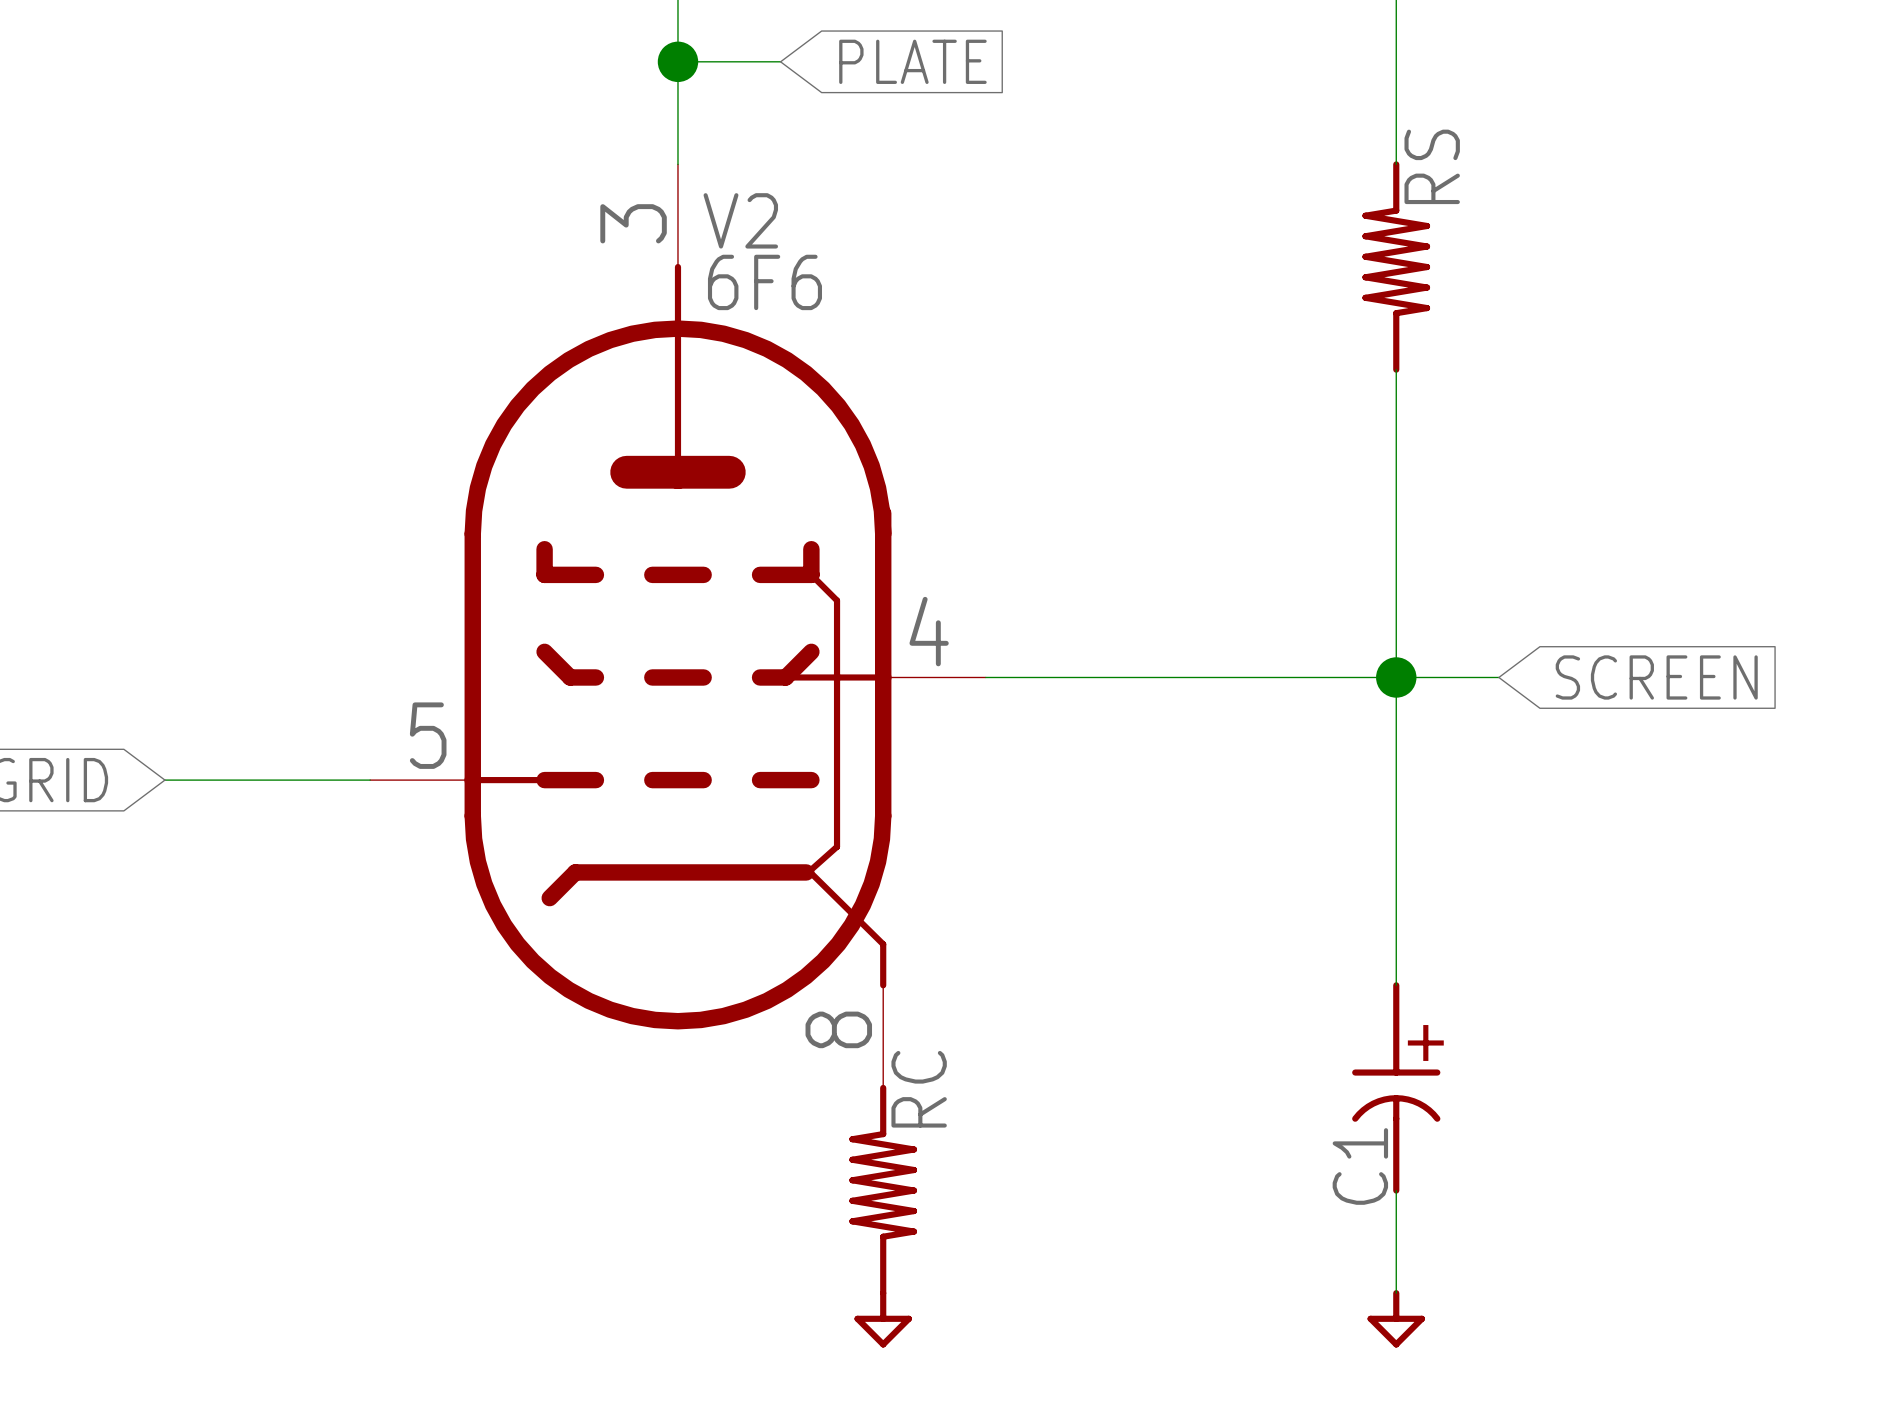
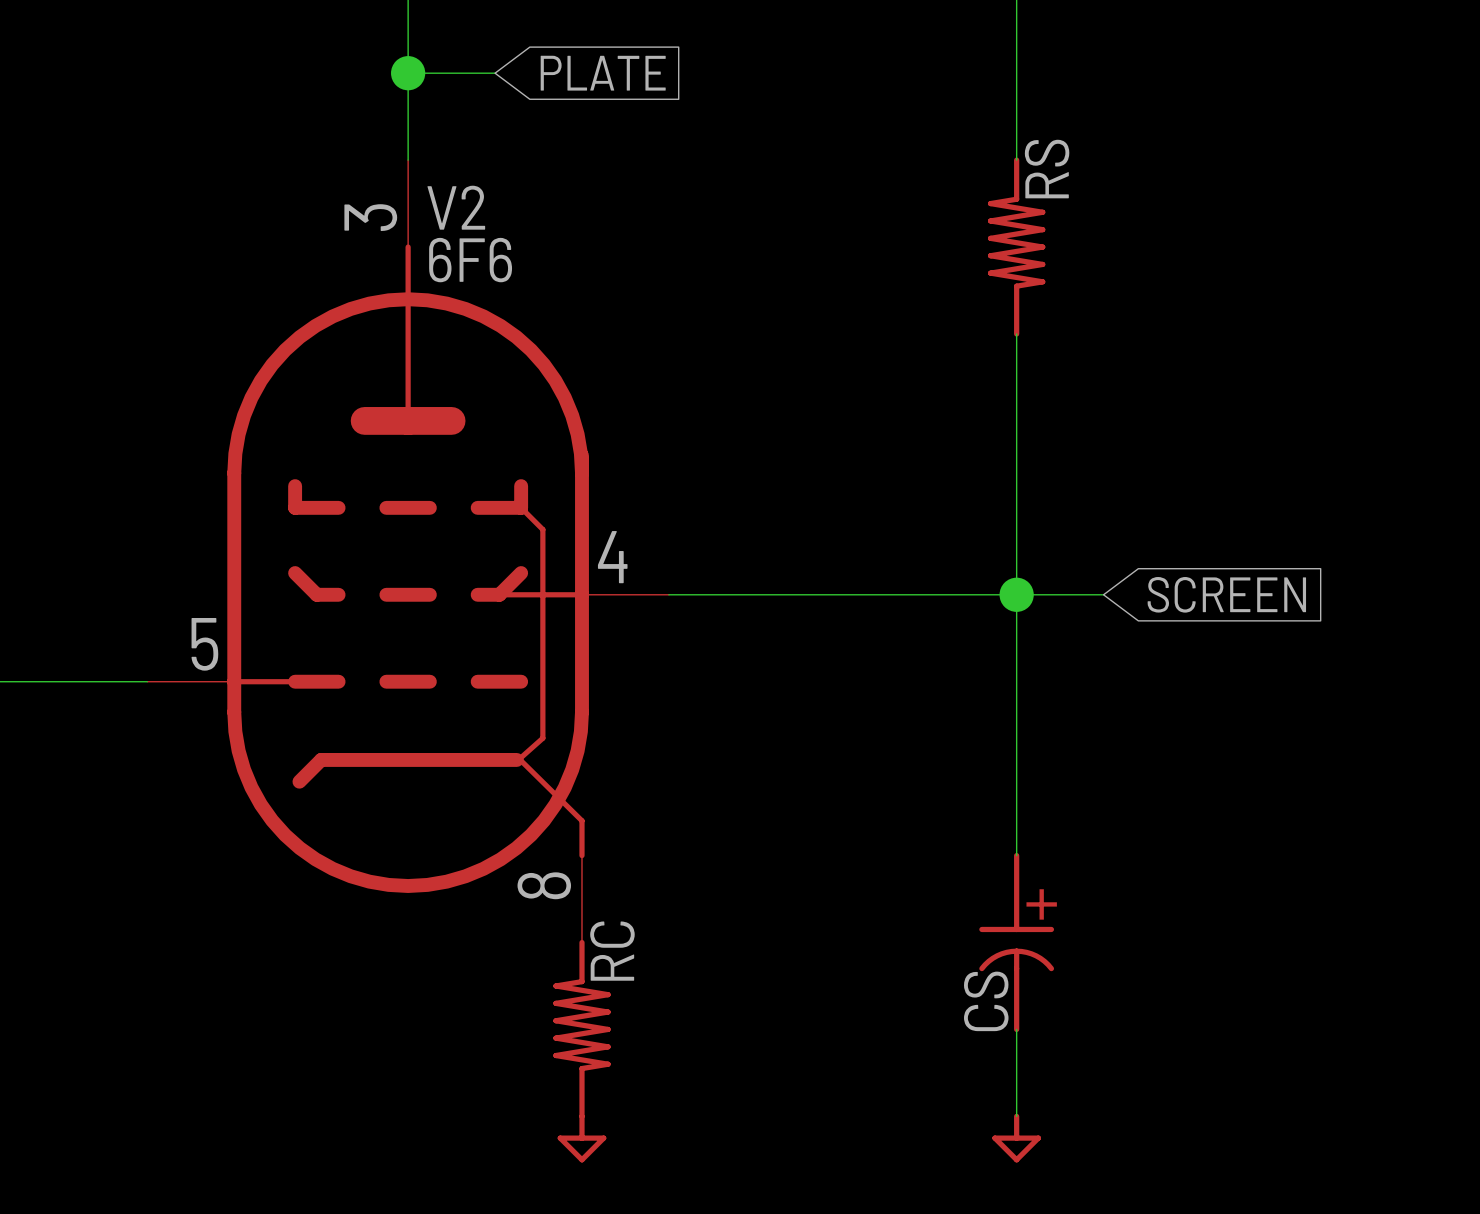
C1 name: C1 (1360, 1166) -> CS (986, 1001)

